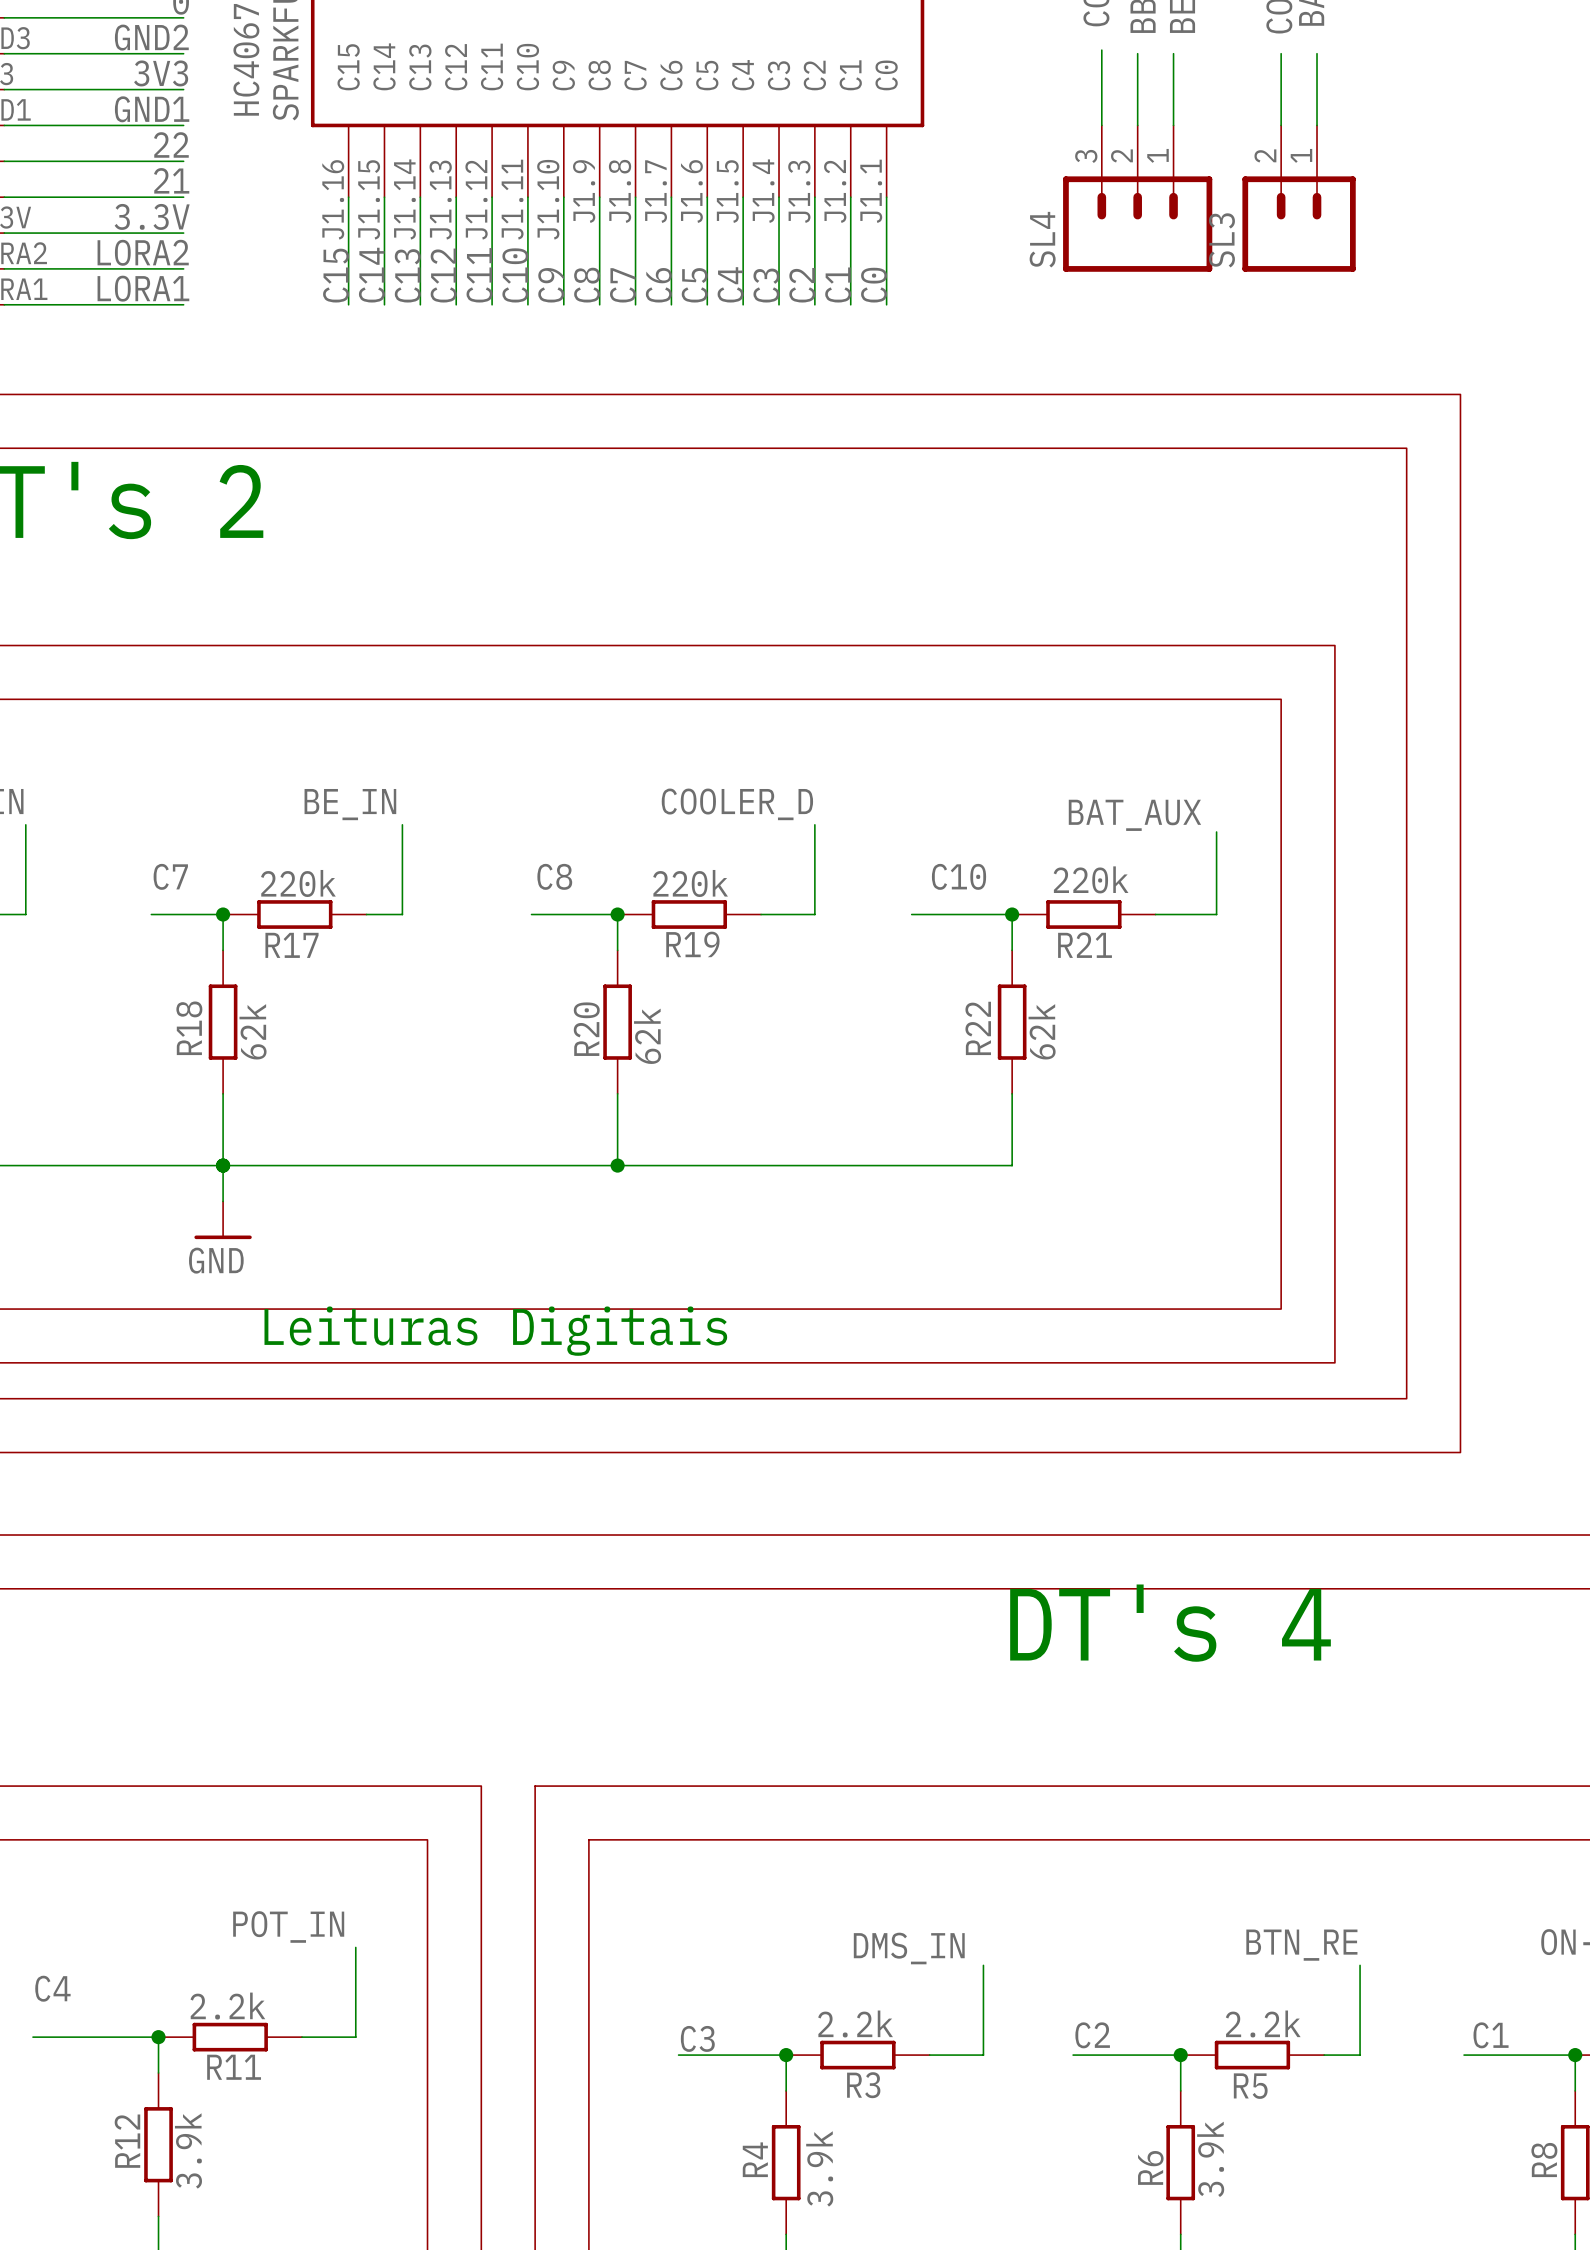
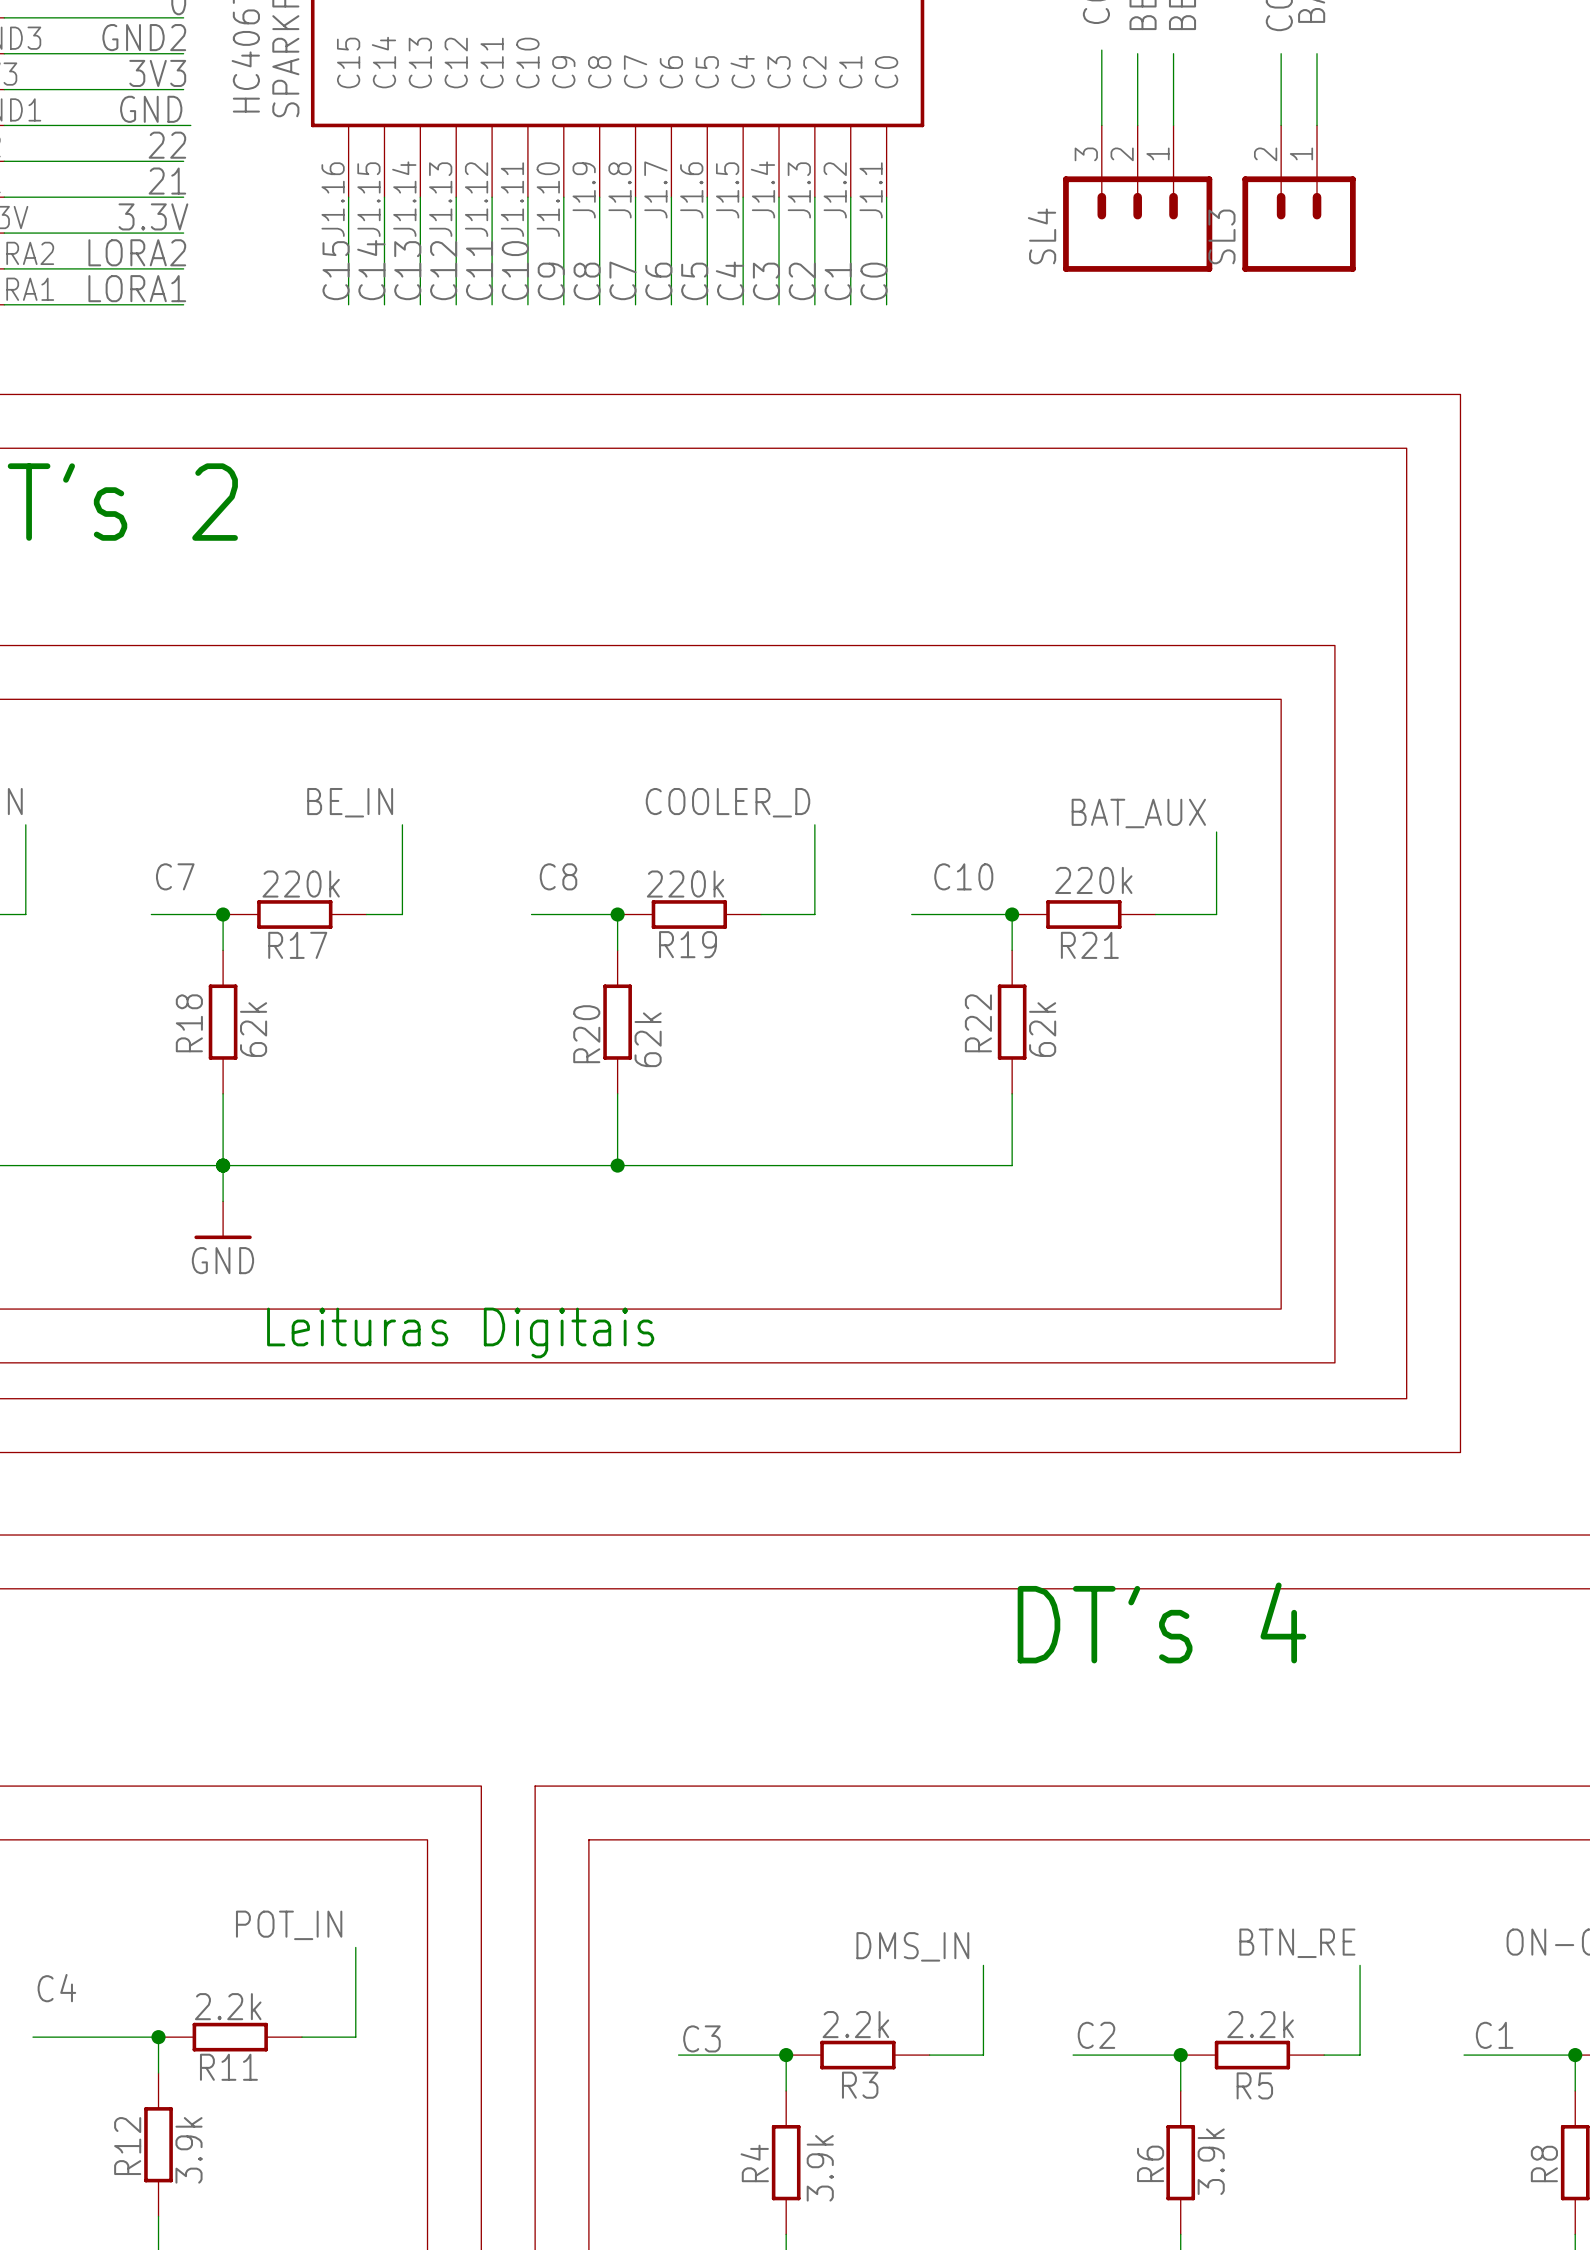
label: GND1 (152, 109) -> GND (151, 109)
wire: none -> (183, 125) (190, 125)

